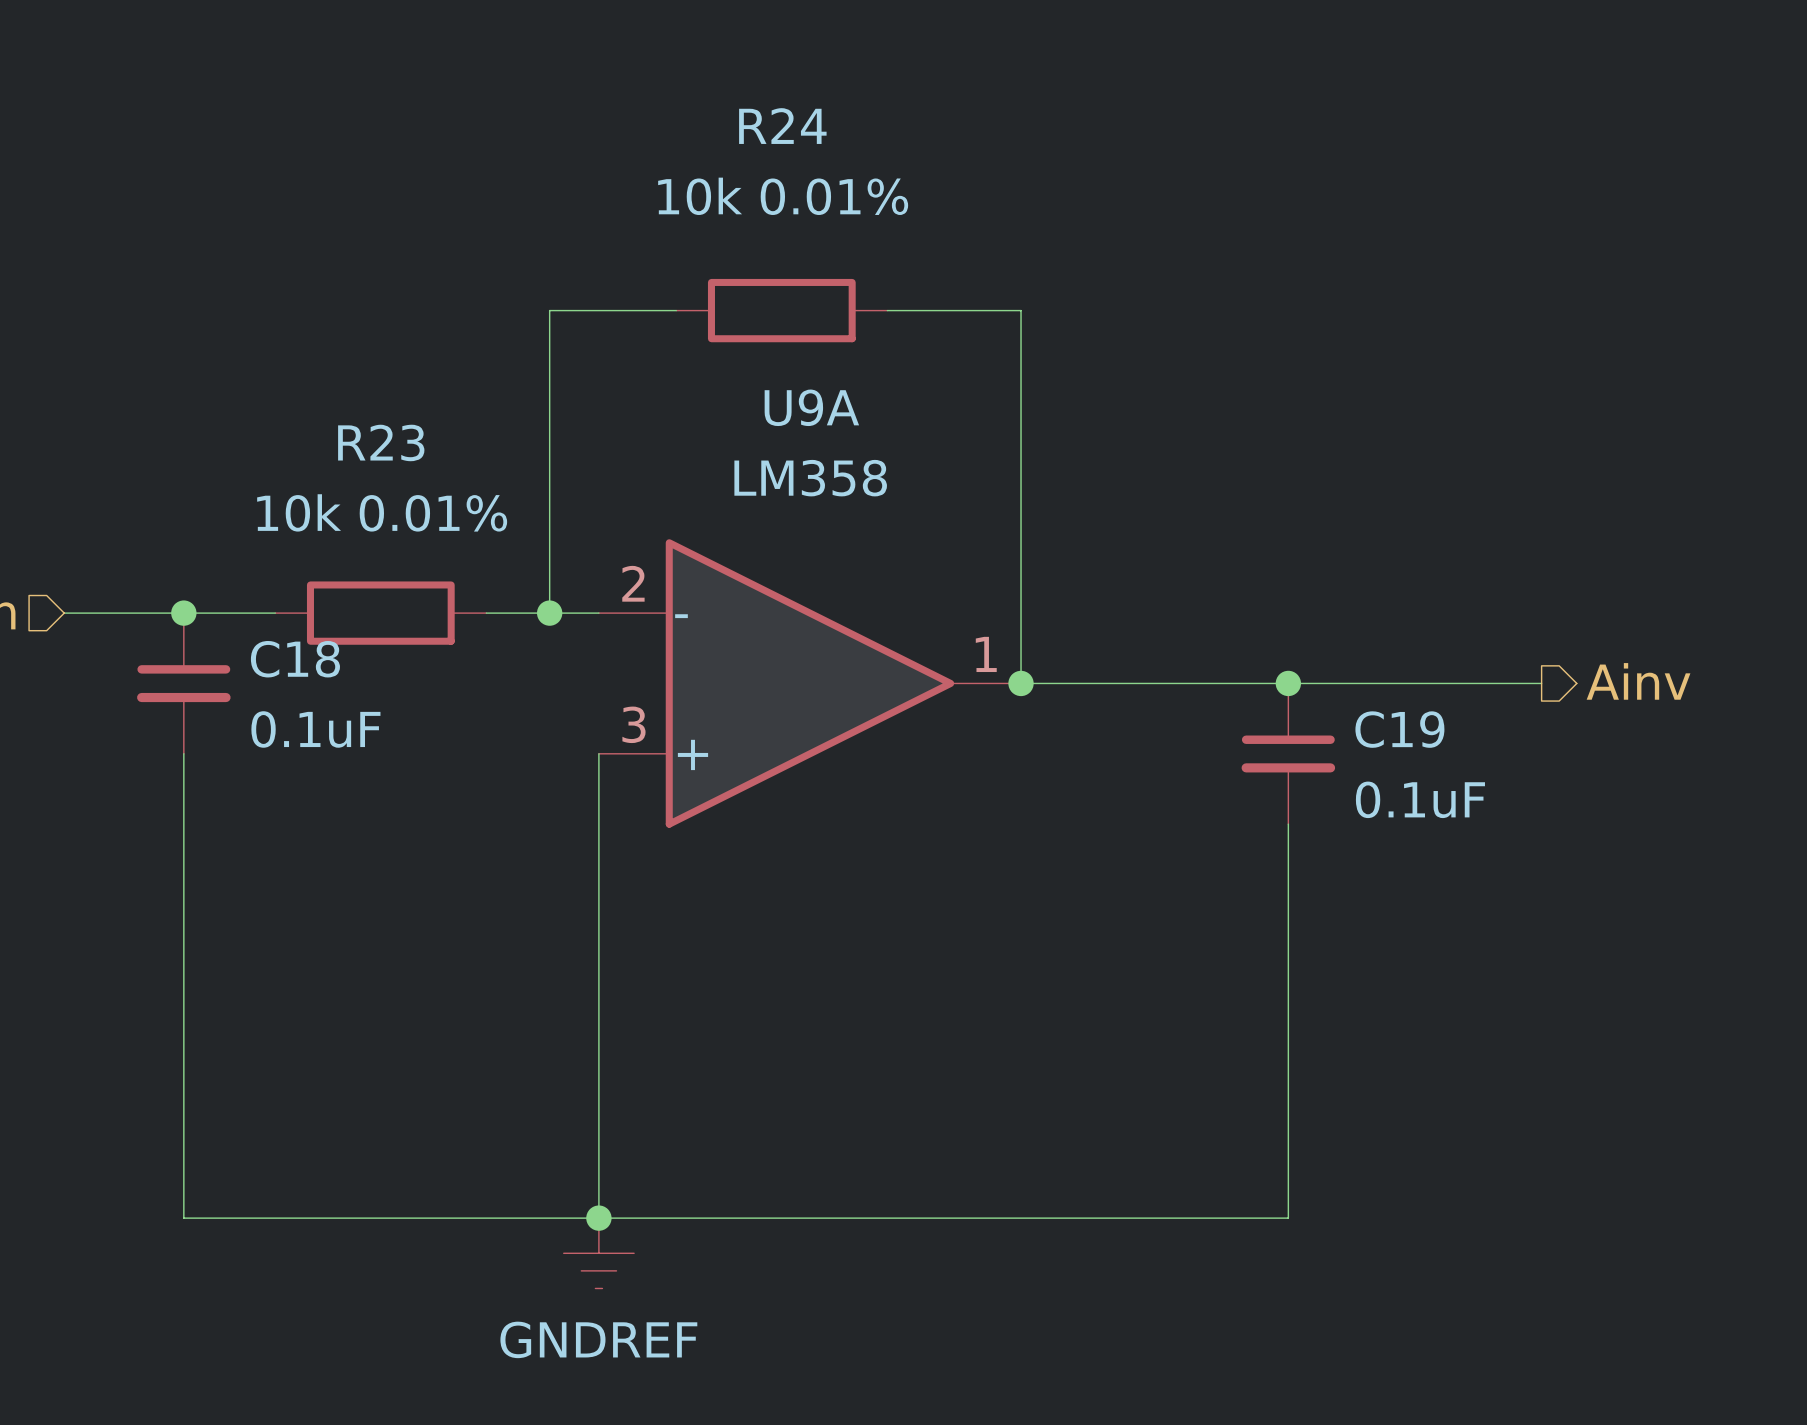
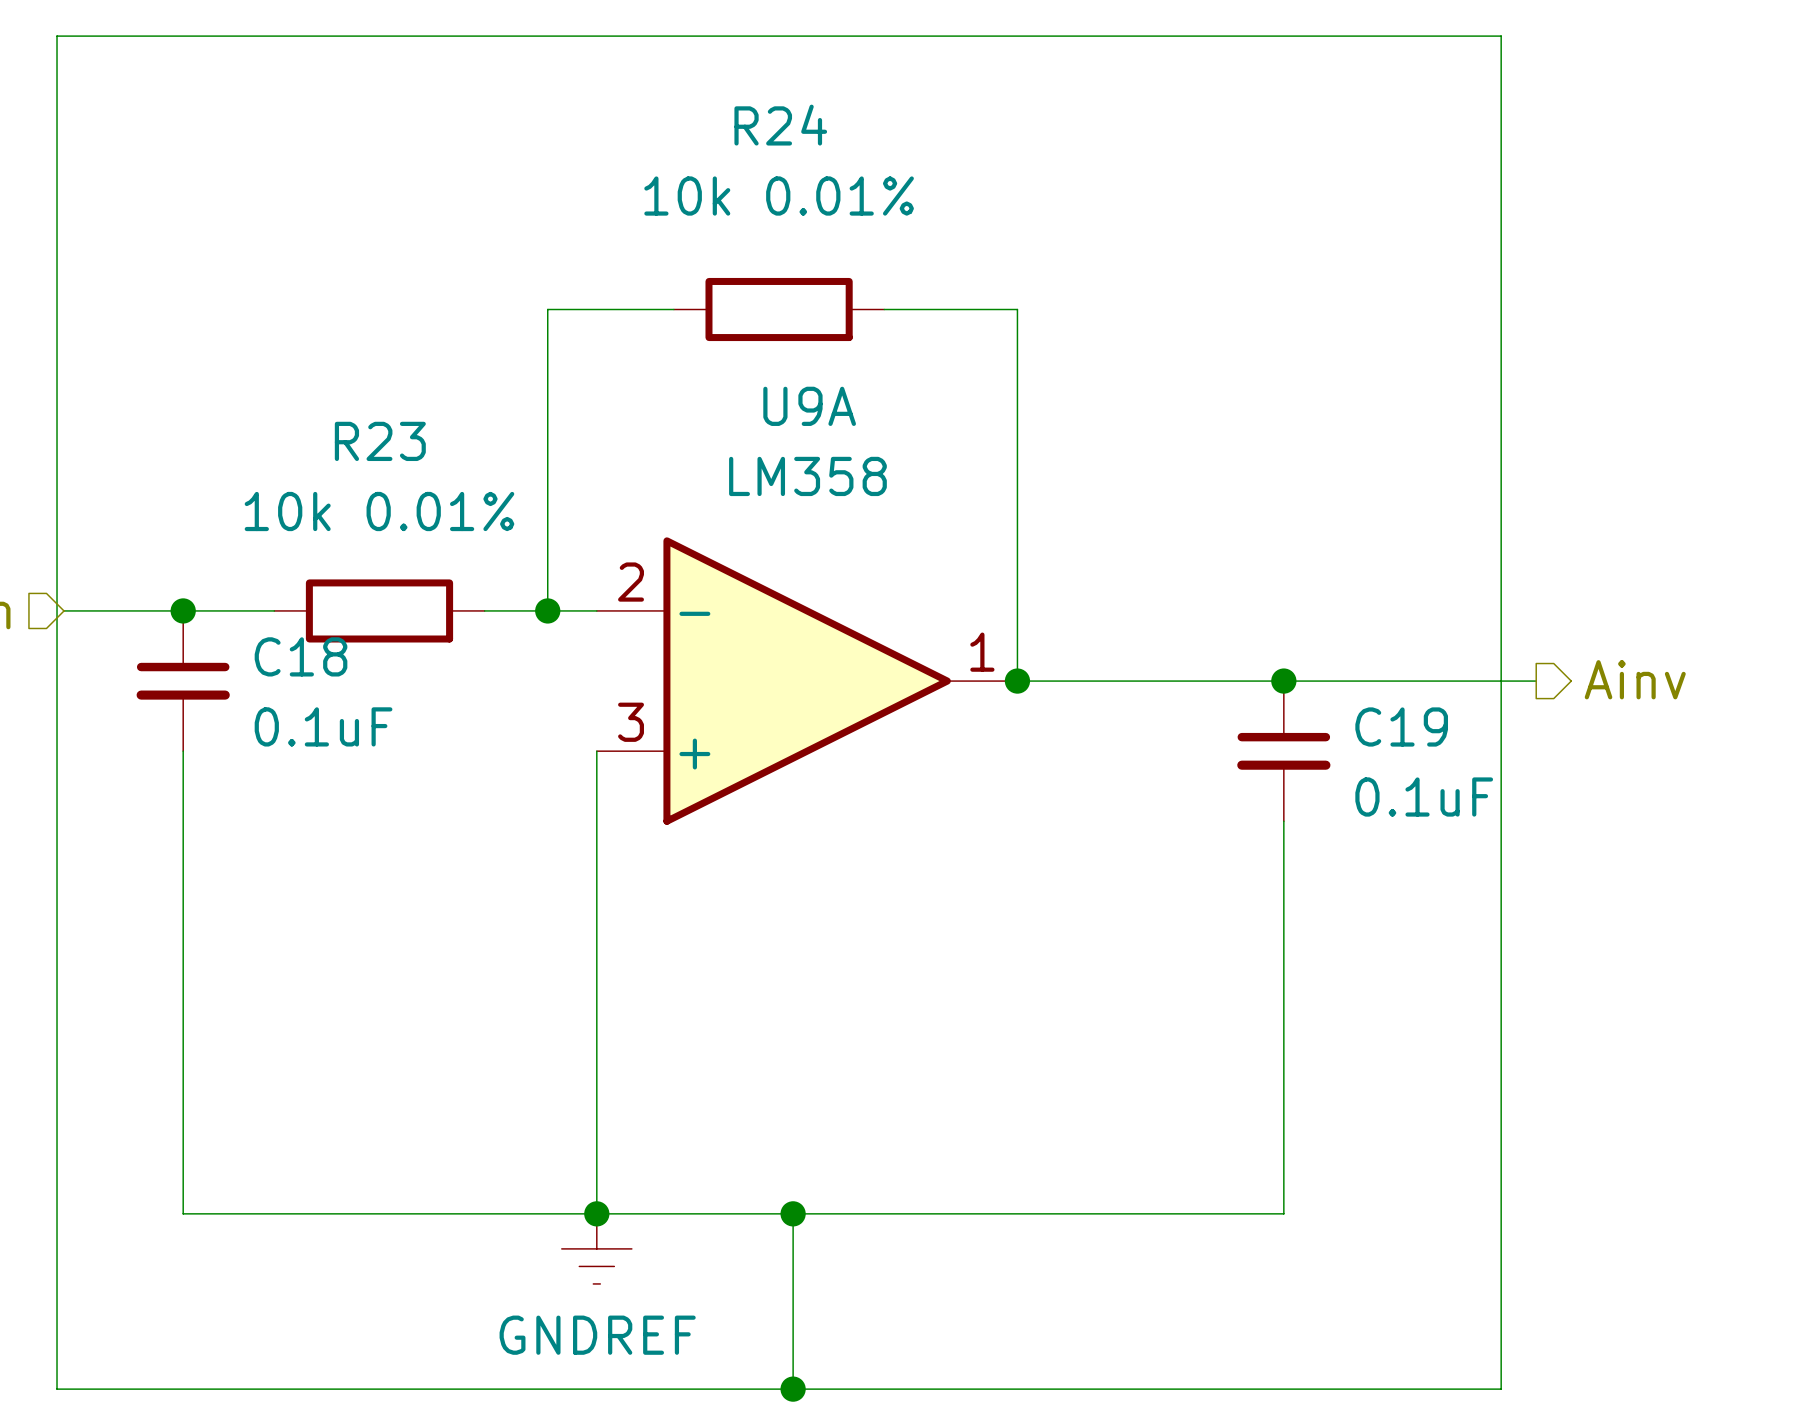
wire: none -> (57, 36) (1501, 36) (1501, 1389) (57, 1389) (57, 36)
wire: none -> (793, 1213) (793, 1389)
junction: none -> (793, 1213)
junction: none -> (793, 1389)

